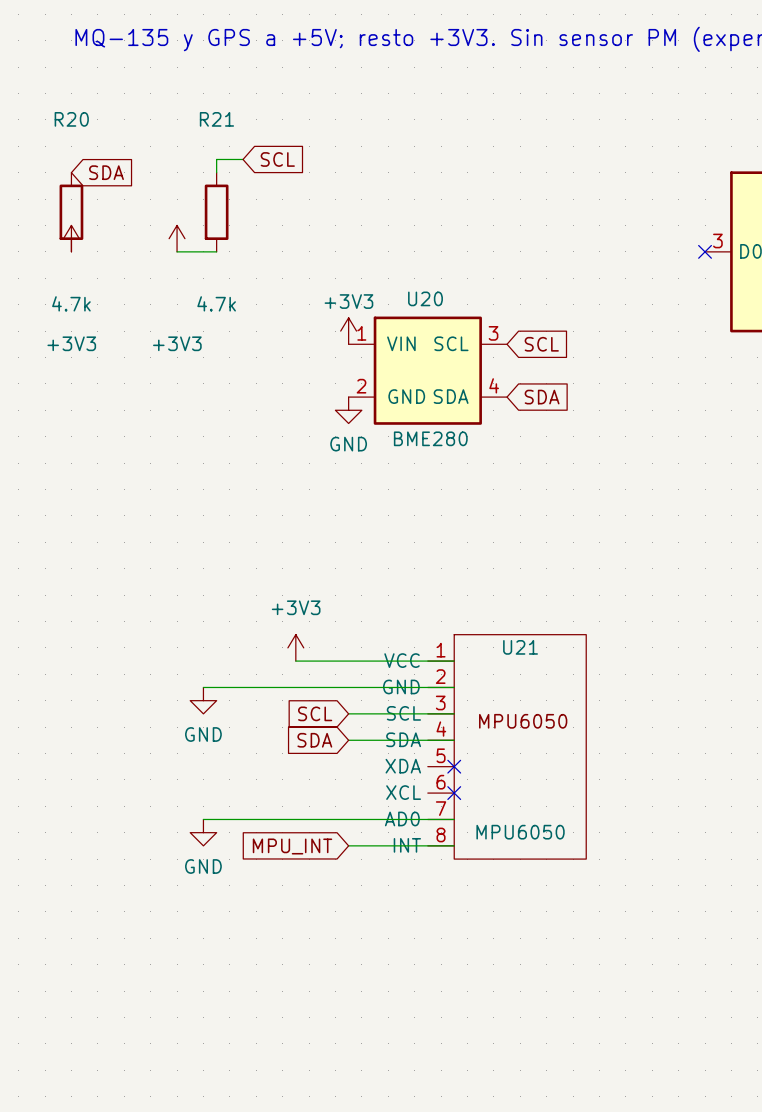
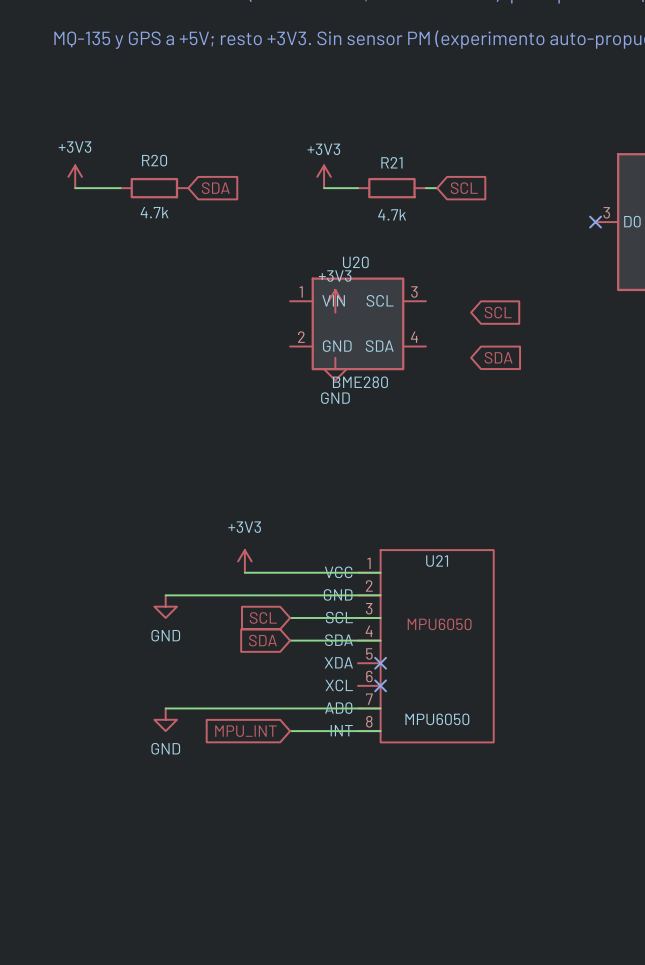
R20 name position: R20 (71, 119) -> R20 (154, 160)
R21 name position: R21 (216, 119) -> R21 (391, 162)
wire: (243, 159) (216, 159) (216, 172) -> none
global label: SCL (277, 159) -> none
global label position: SDA (106, 172) -> SDA (215, 188)
power symbol: none -> +3V3 (75, 176)
power symbol: none -> +3V3 (324, 176)
R20 rotation: 0° (71, 212) -> 90° clockwise (154, 188)
R20 position: (71, 212) -> (154, 188)
wire: none -> (75, 188) (120, 188)
R21 rotation: 0° (216, 212) -> 90° clockwise (391, 188)
R21 position: (216, 212) -> (391, 188)
wire: none -> (425, 188) (437, 188)
global label: none -> SCL (464, 188)
power symbol: +3V3 (71, 238) -> none
power symbol: +3V3 (177, 238) -> none
wire: (177, 251) (216, 251) -> (324, 188) (357, 188)
R20 value position: 4.7k (71, 303) -> 4.7k (154, 212)
R21 value position: 4.7k (216, 303) -> 4.7k (392, 214)
power symbol position: +3V3 (348, 331) -> +3V3 (335, 301)
global label position: SCL (541, 344) -> SCL (498, 312)
global label position: SDA (542, 397) -> SDA (498, 357)
power symbol position: GND (348, 410) -> GND (335, 369)

